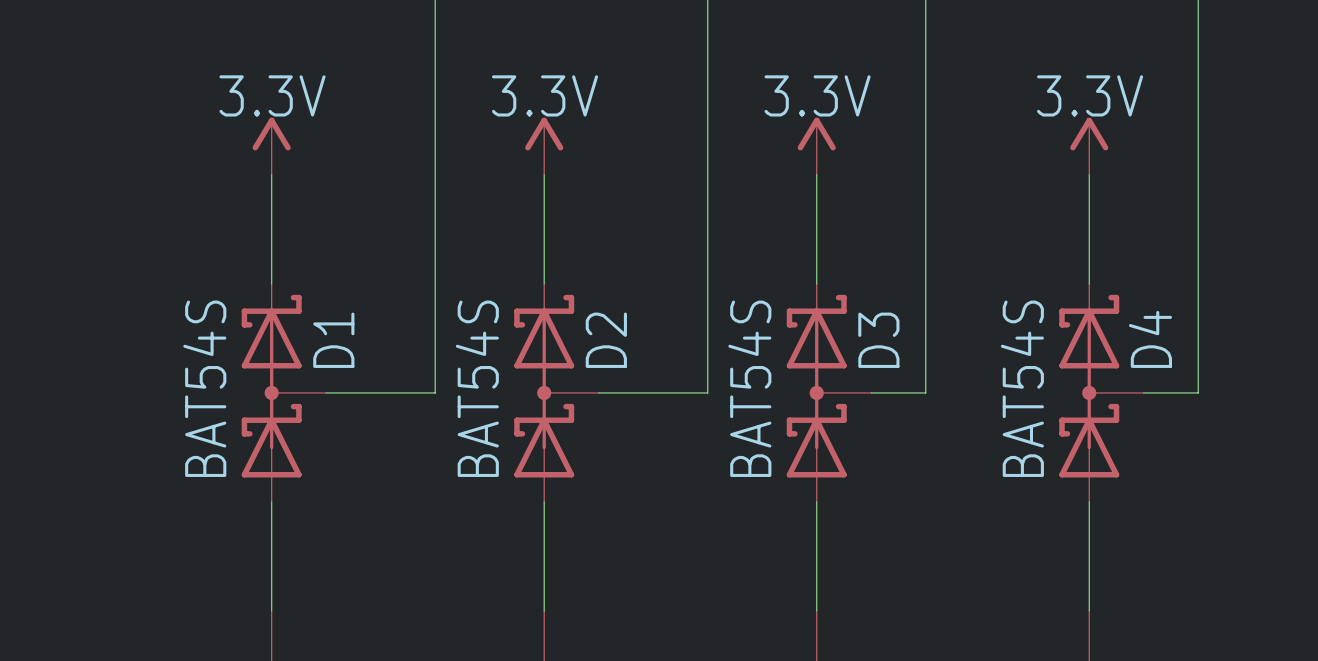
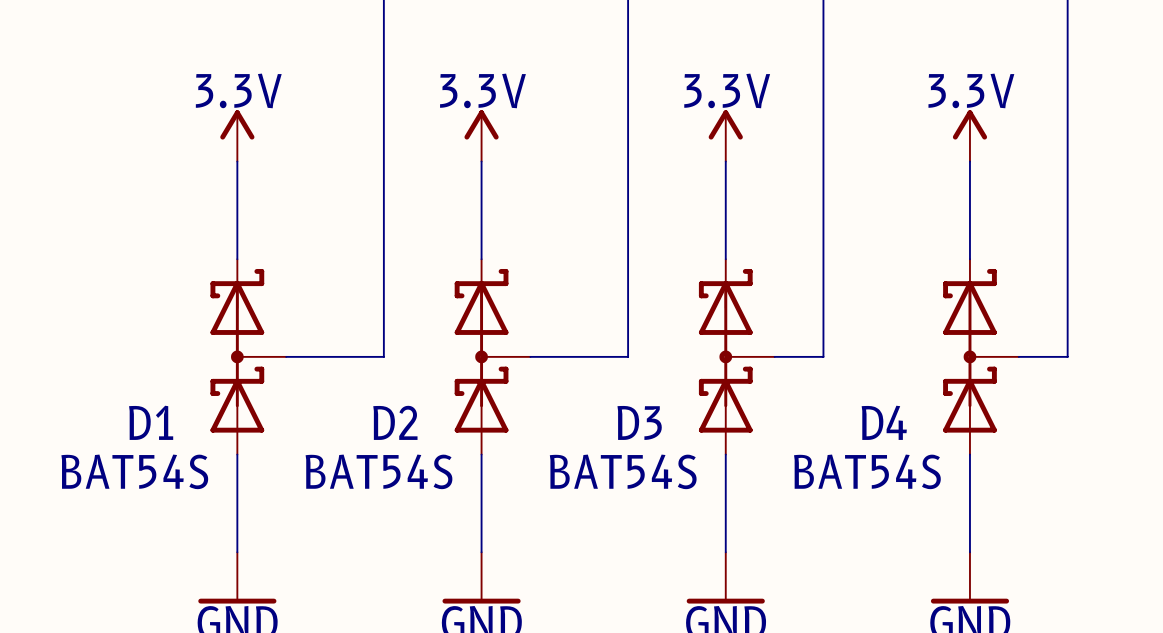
D4 name rotation: 0° (1150, 339) -> 90° clockwise (884, 422)
D4 name position: D4 (1150, 339) -> D4 (884, 422)
D1 name rotation: 0° (333, 340) -> 90° clockwise (151, 422)
D1 name position: D1 (333, 340) -> D1 (151, 422)
D2 name rotation: 0° (606, 340) -> 90° clockwise (395, 422)
D2 name position: D2 (606, 340) -> D2 (395, 422)
D3 name rotation: 0° (878, 340) -> 90° clockwise (639, 422)
D3 name position: D3 (878, 340) -> D3 (639, 422)
D1 value rotation: 0° (204, 388) -> 90° clockwise (134, 471)
D2 value rotation: 0° (477, 388) -> 90° clockwise (378, 471)
D3 value rotation: 0° (749, 388) -> 90° clockwise (623, 471)
D4 value rotation: 0° (1022, 388) -> 90° clockwise (867, 471)

